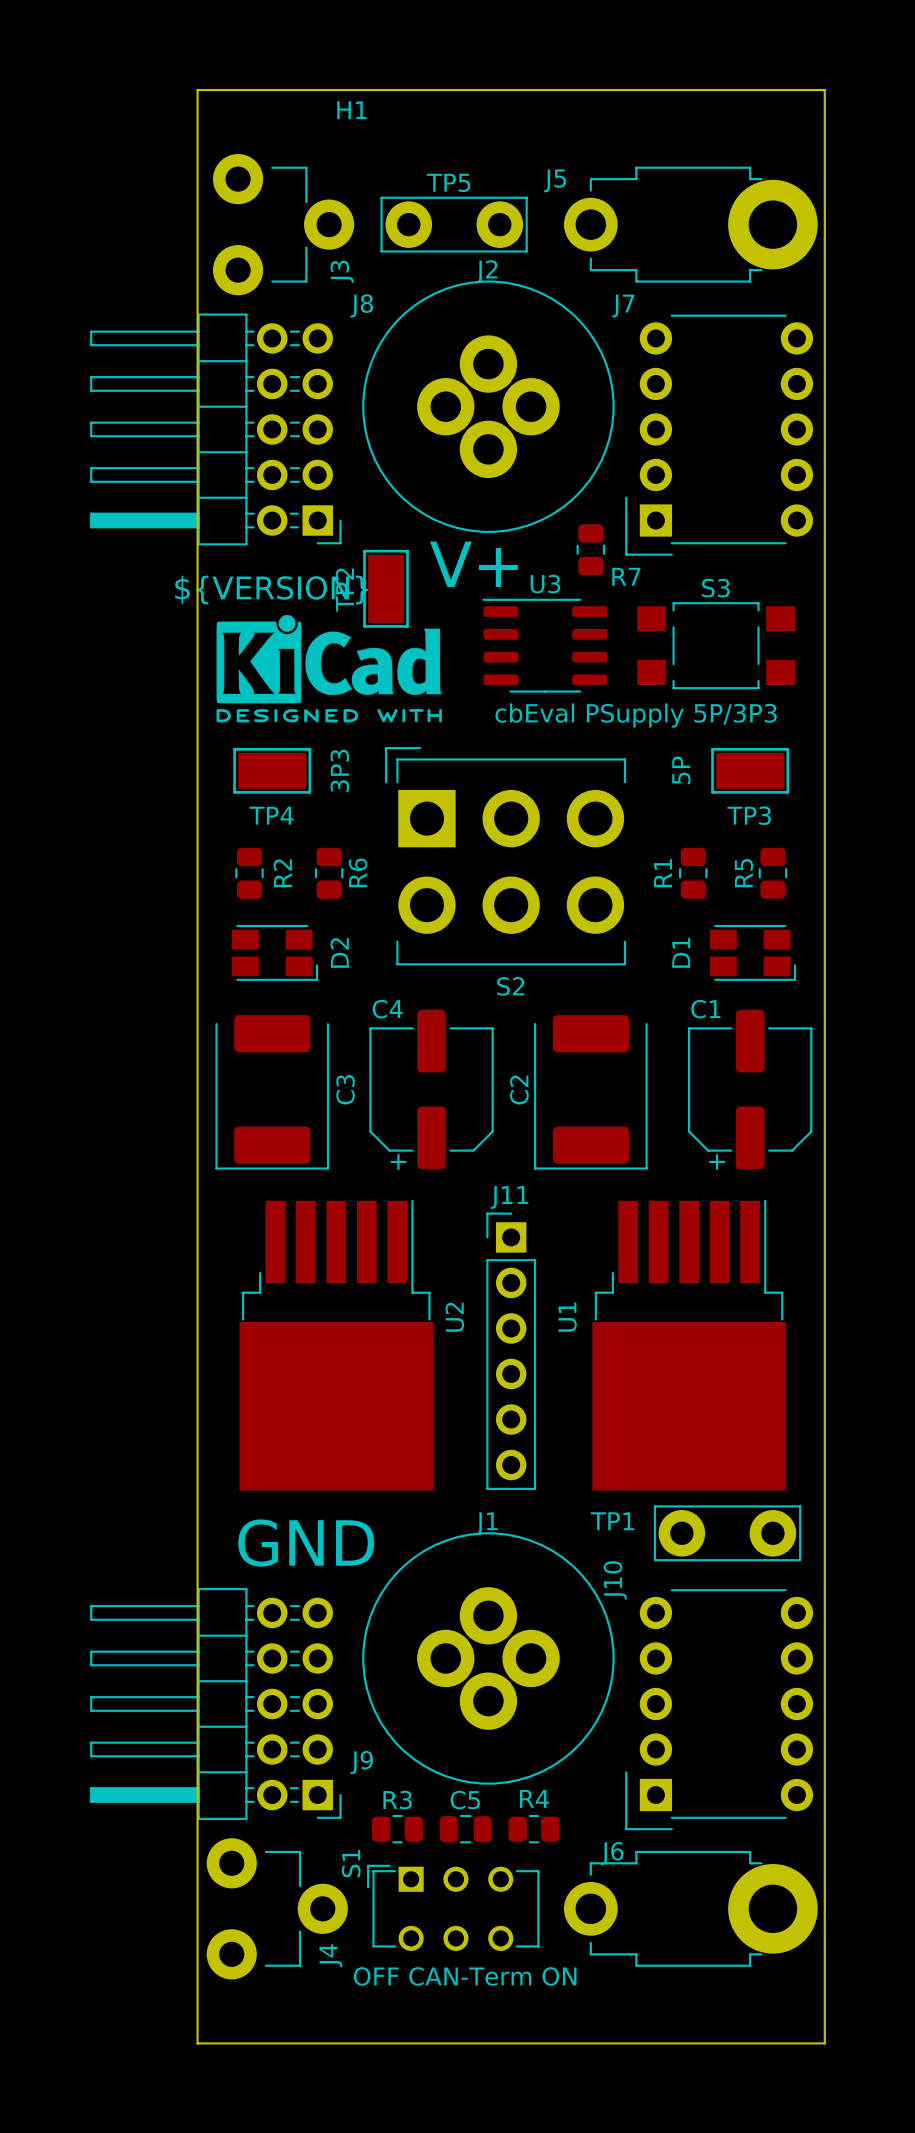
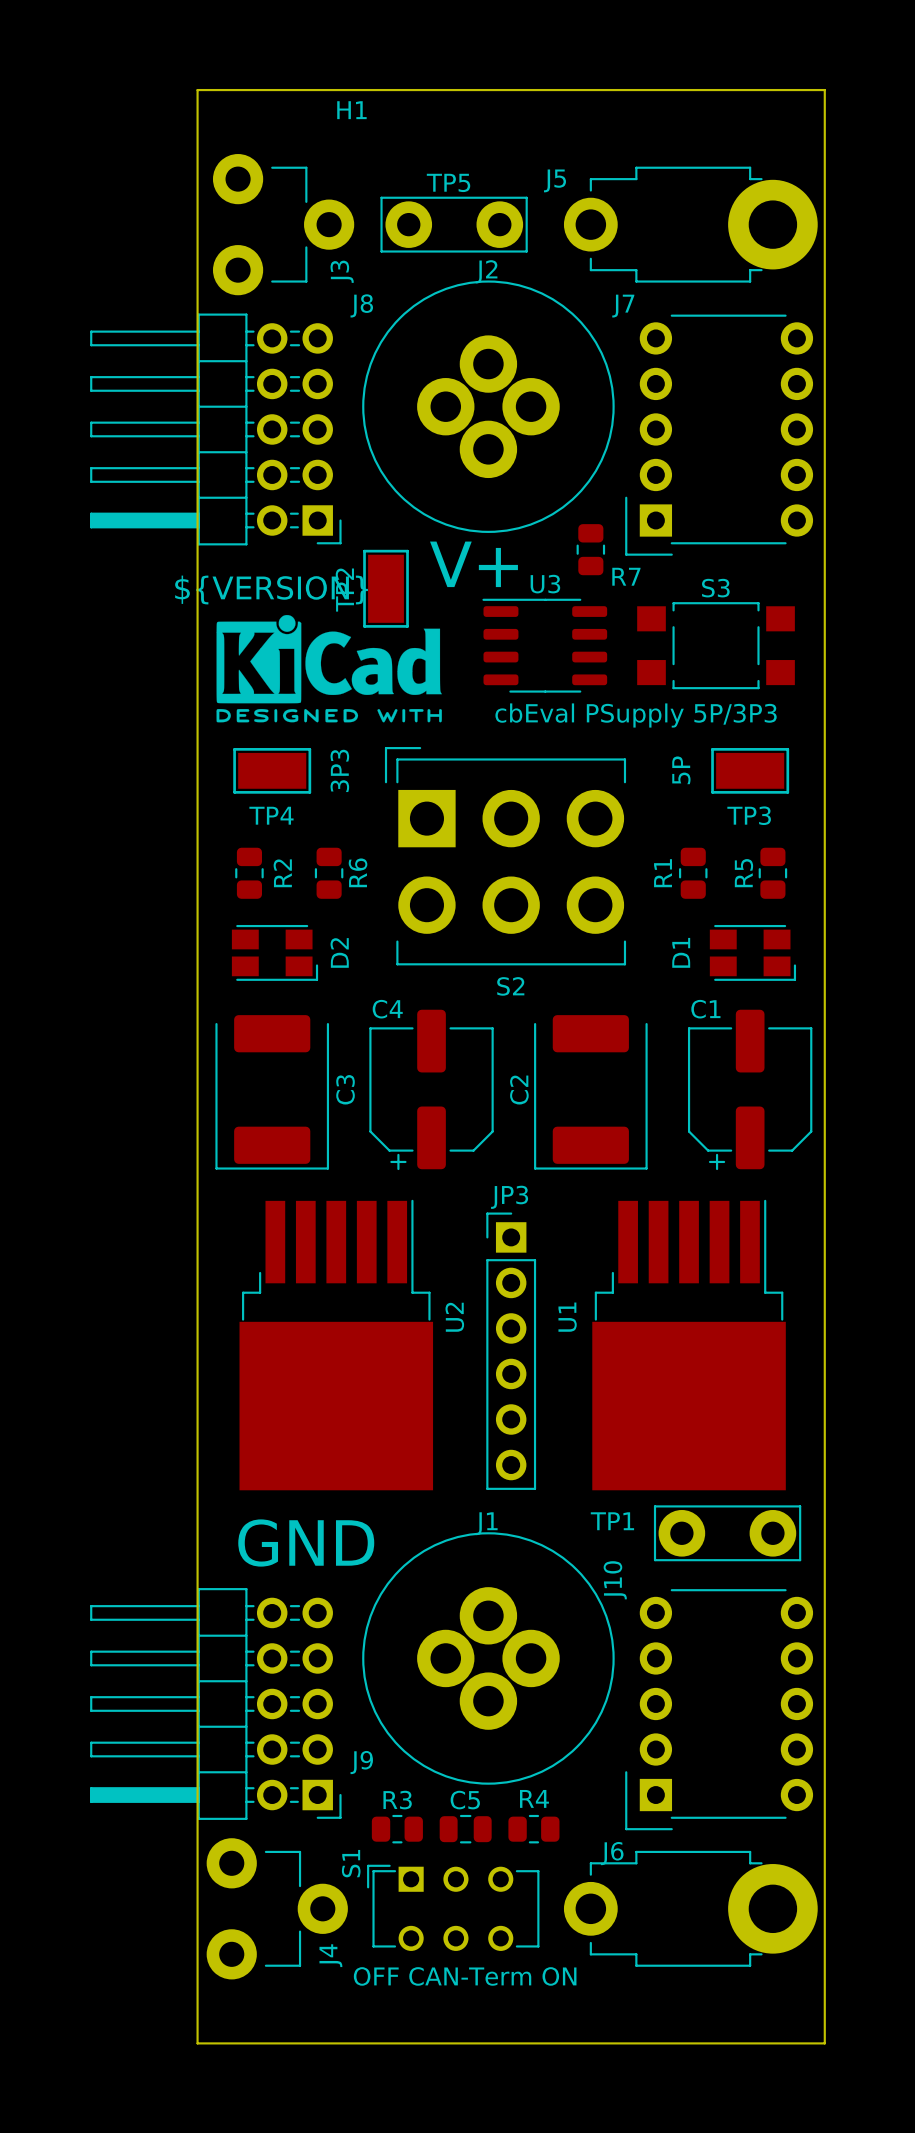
J11 name: J11 (509, 1197) -> JP3 (509, 1197)

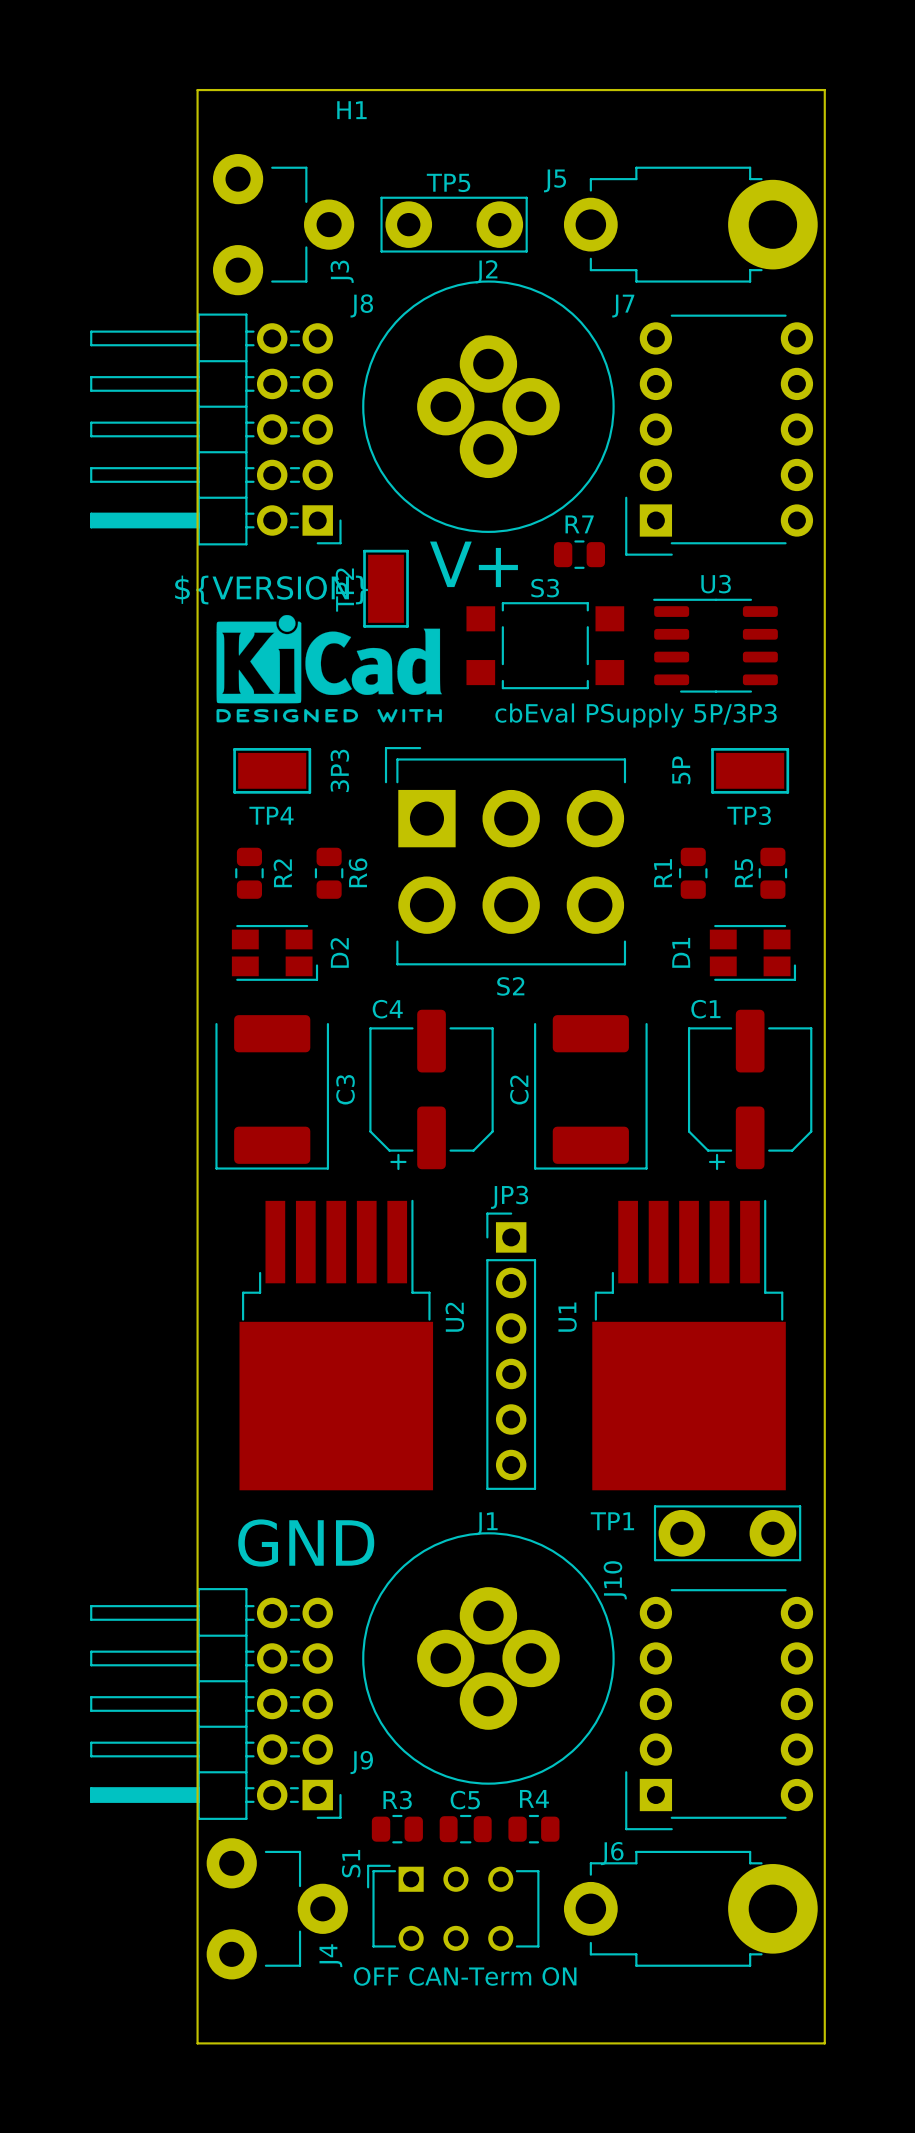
R7 rotation: 0° (590, 549) -> 90° clockwise (579, 554)
R7 name position: R7 (626, 576) -> R7 (579, 524)
U3 position: (544, 645) -> (715, 645)
S3 position: (716, 645) -> (545, 645)

